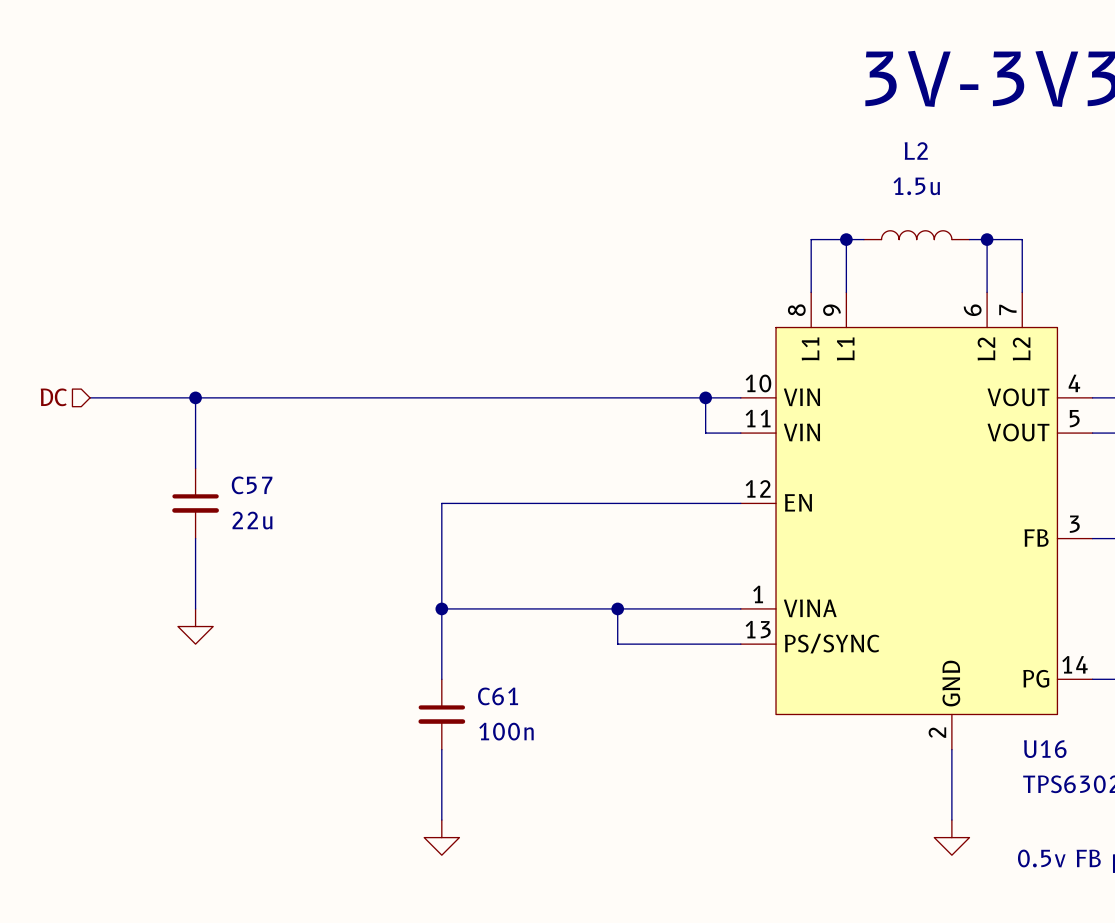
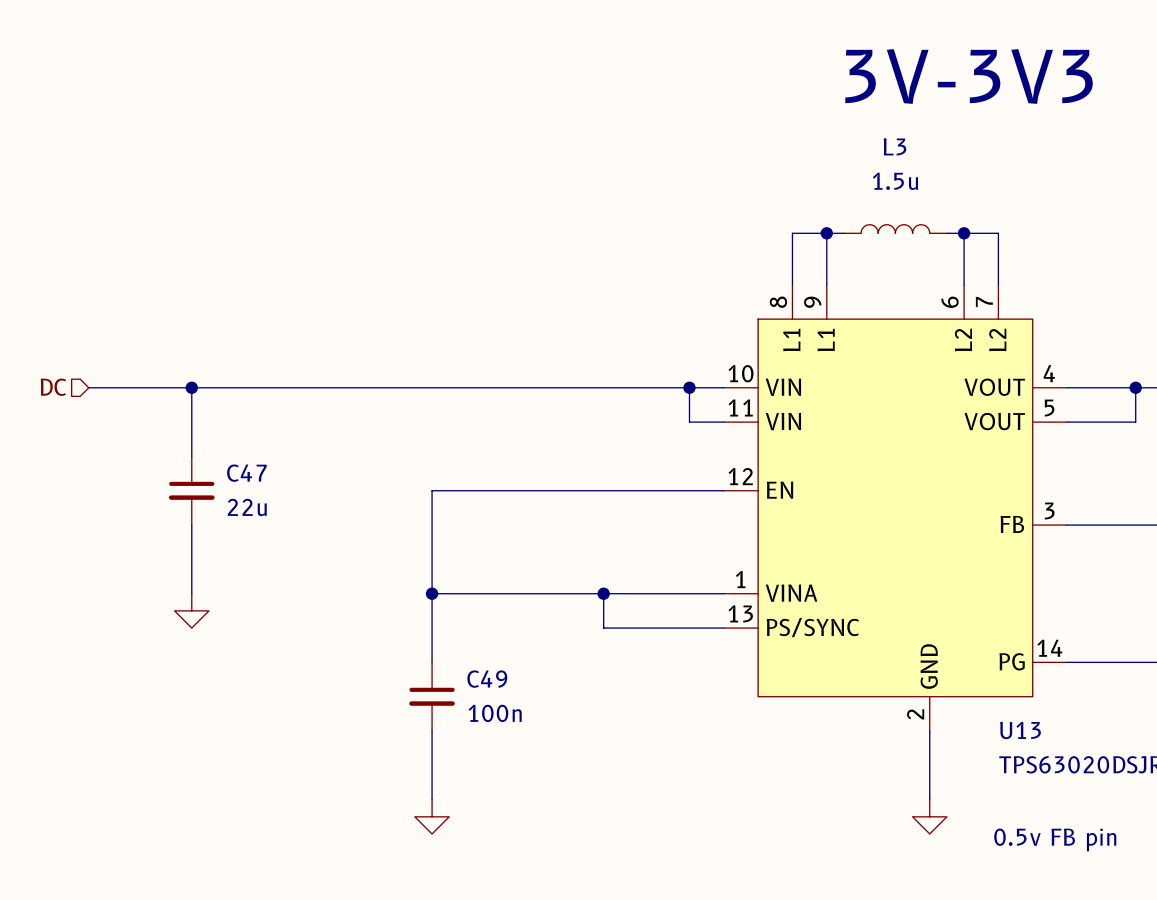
L2 name: L2 (916, 150) -> L3 (894, 146)
C57 name: C57 (252, 485) -> C47 (246, 473)
C61 name: C61 (498, 696) -> C49 (487, 679)
U16 name: U16 (1045, 749) -> U13 (1020, 730)

